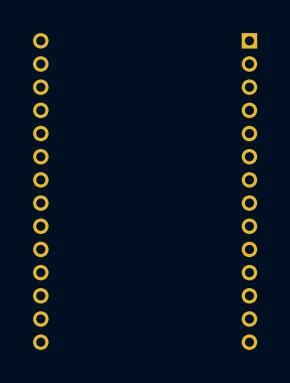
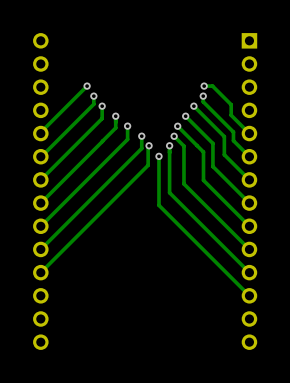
track: none -> (87, 86) (40, 133)
via: none -> (87, 86)
track: none -> (204, 86) (212, 86) (231, 104) (231, 115) (249, 133)
via: none -> (204, 86)
track: none -> (93, 96) (93, 104) (40, 156)
via: none -> (93, 96)
track: none -> (203, 96) (203, 101) (233, 132) (233, 140) (249, 156)
via: none -> (203, 96)
track: none -> (102, 106) (102, 118) (40, 179)
via: none -> (102, 106)
track: none -> (193, 106) (224, 136) (224, 154) (249, 179)
via: none -> (193, 106)
track: none -> (115, 116) (115, 127) (102, 141)
via: none -> (115, 116)
track: none -> (185, 116) (212, 143) (212, 166) (249, 203)
via: none -> (185, 116)
track: none -> (127, 126) (127, 139) (40, 226)
via: none -> (127, 126)
track: none -> (177, 126) (203, 152) (203, 180) (249, 226)
via: none -> (177, 126)
track: none -> (141, 136) (141, 148) (40, 249)
via: none -> (141, 136)
track: none -> (174, 136) (183, 146) (183, 183) (249, 249)
via: none -> (174, 136)
track: none -> (102, 141) (40, 203)
via: none -> (149, 145)
track: none -> (169, 145) (169, 192) (249, 272)
via: none -> (169, 145)
track: none -> (148, 148) (148, 165) (40, 272)
track: none -> (158, 156) (158, 205) (249, 295)
via: none -> (158, 156)

